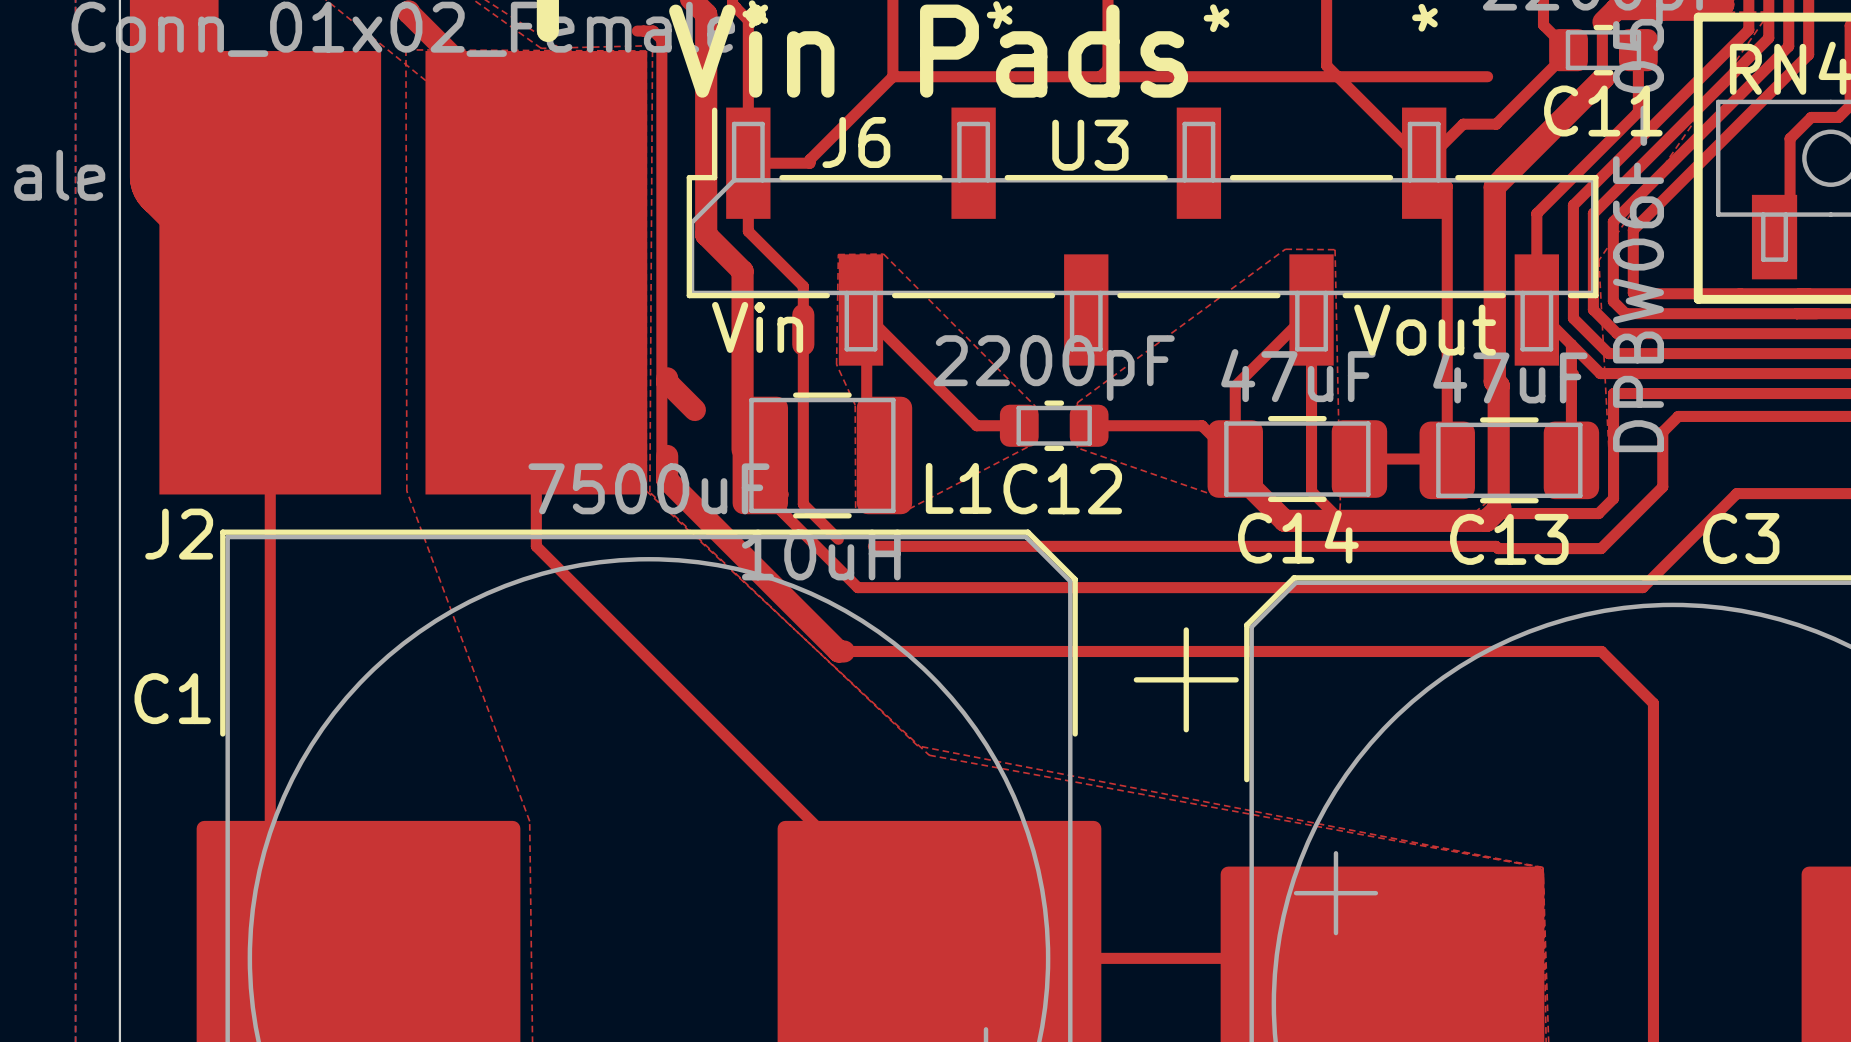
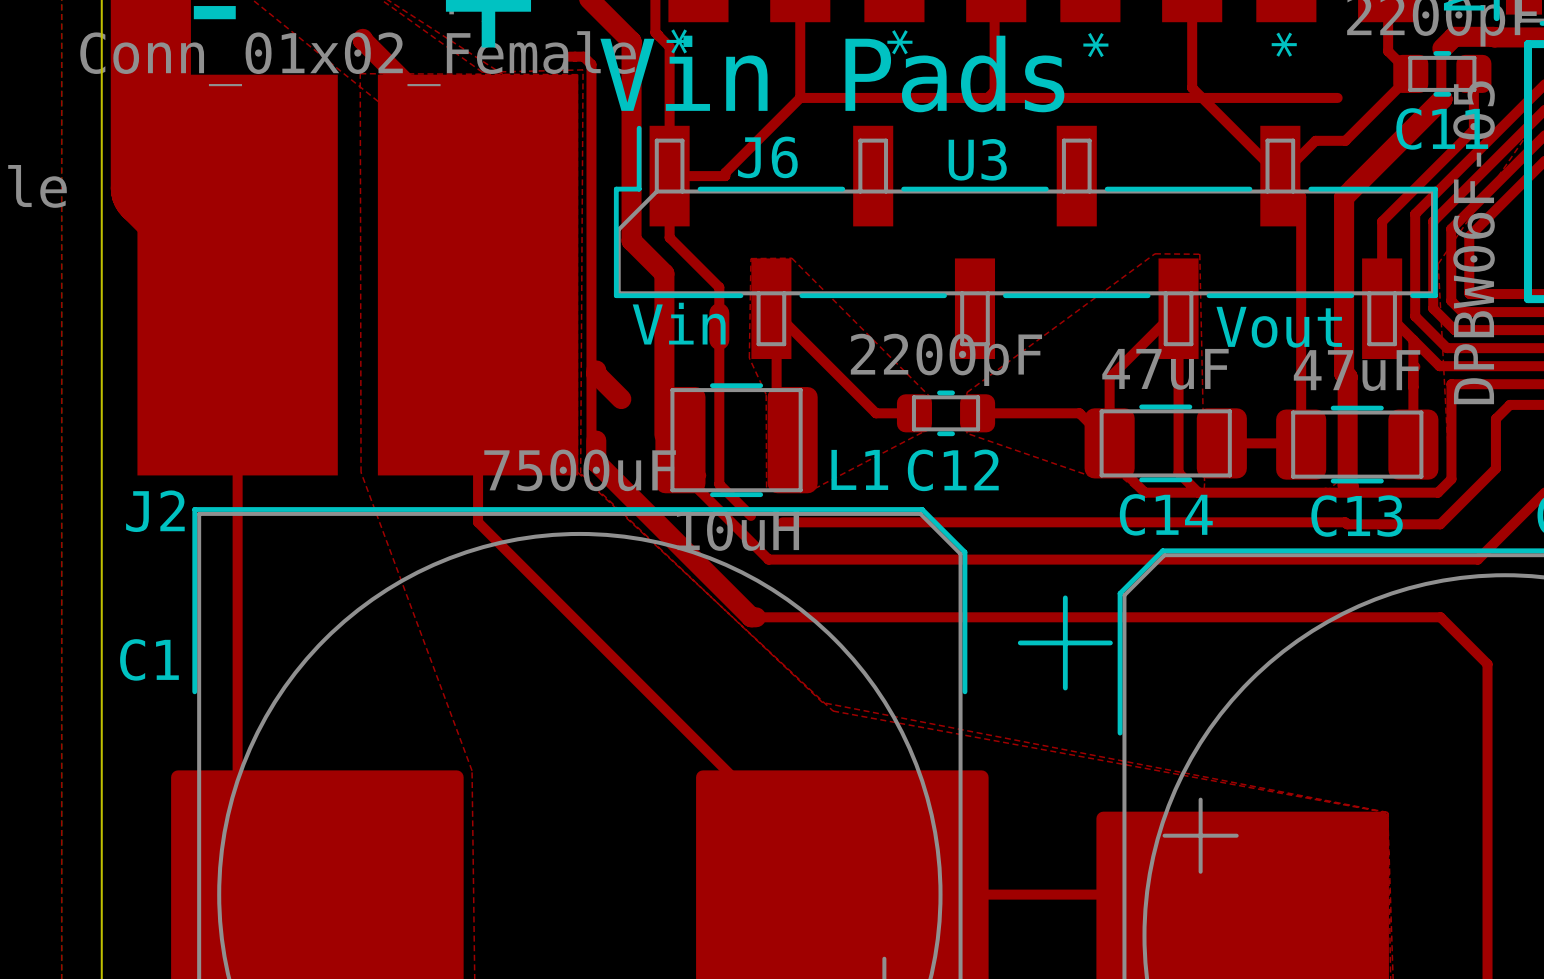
top track: (1235, 459) (1235, 471) (1284, 520) (1486, 520) (1500, 507) -> none
top track: none -> (1109, 457) (1144, 492) (1349, 492)

